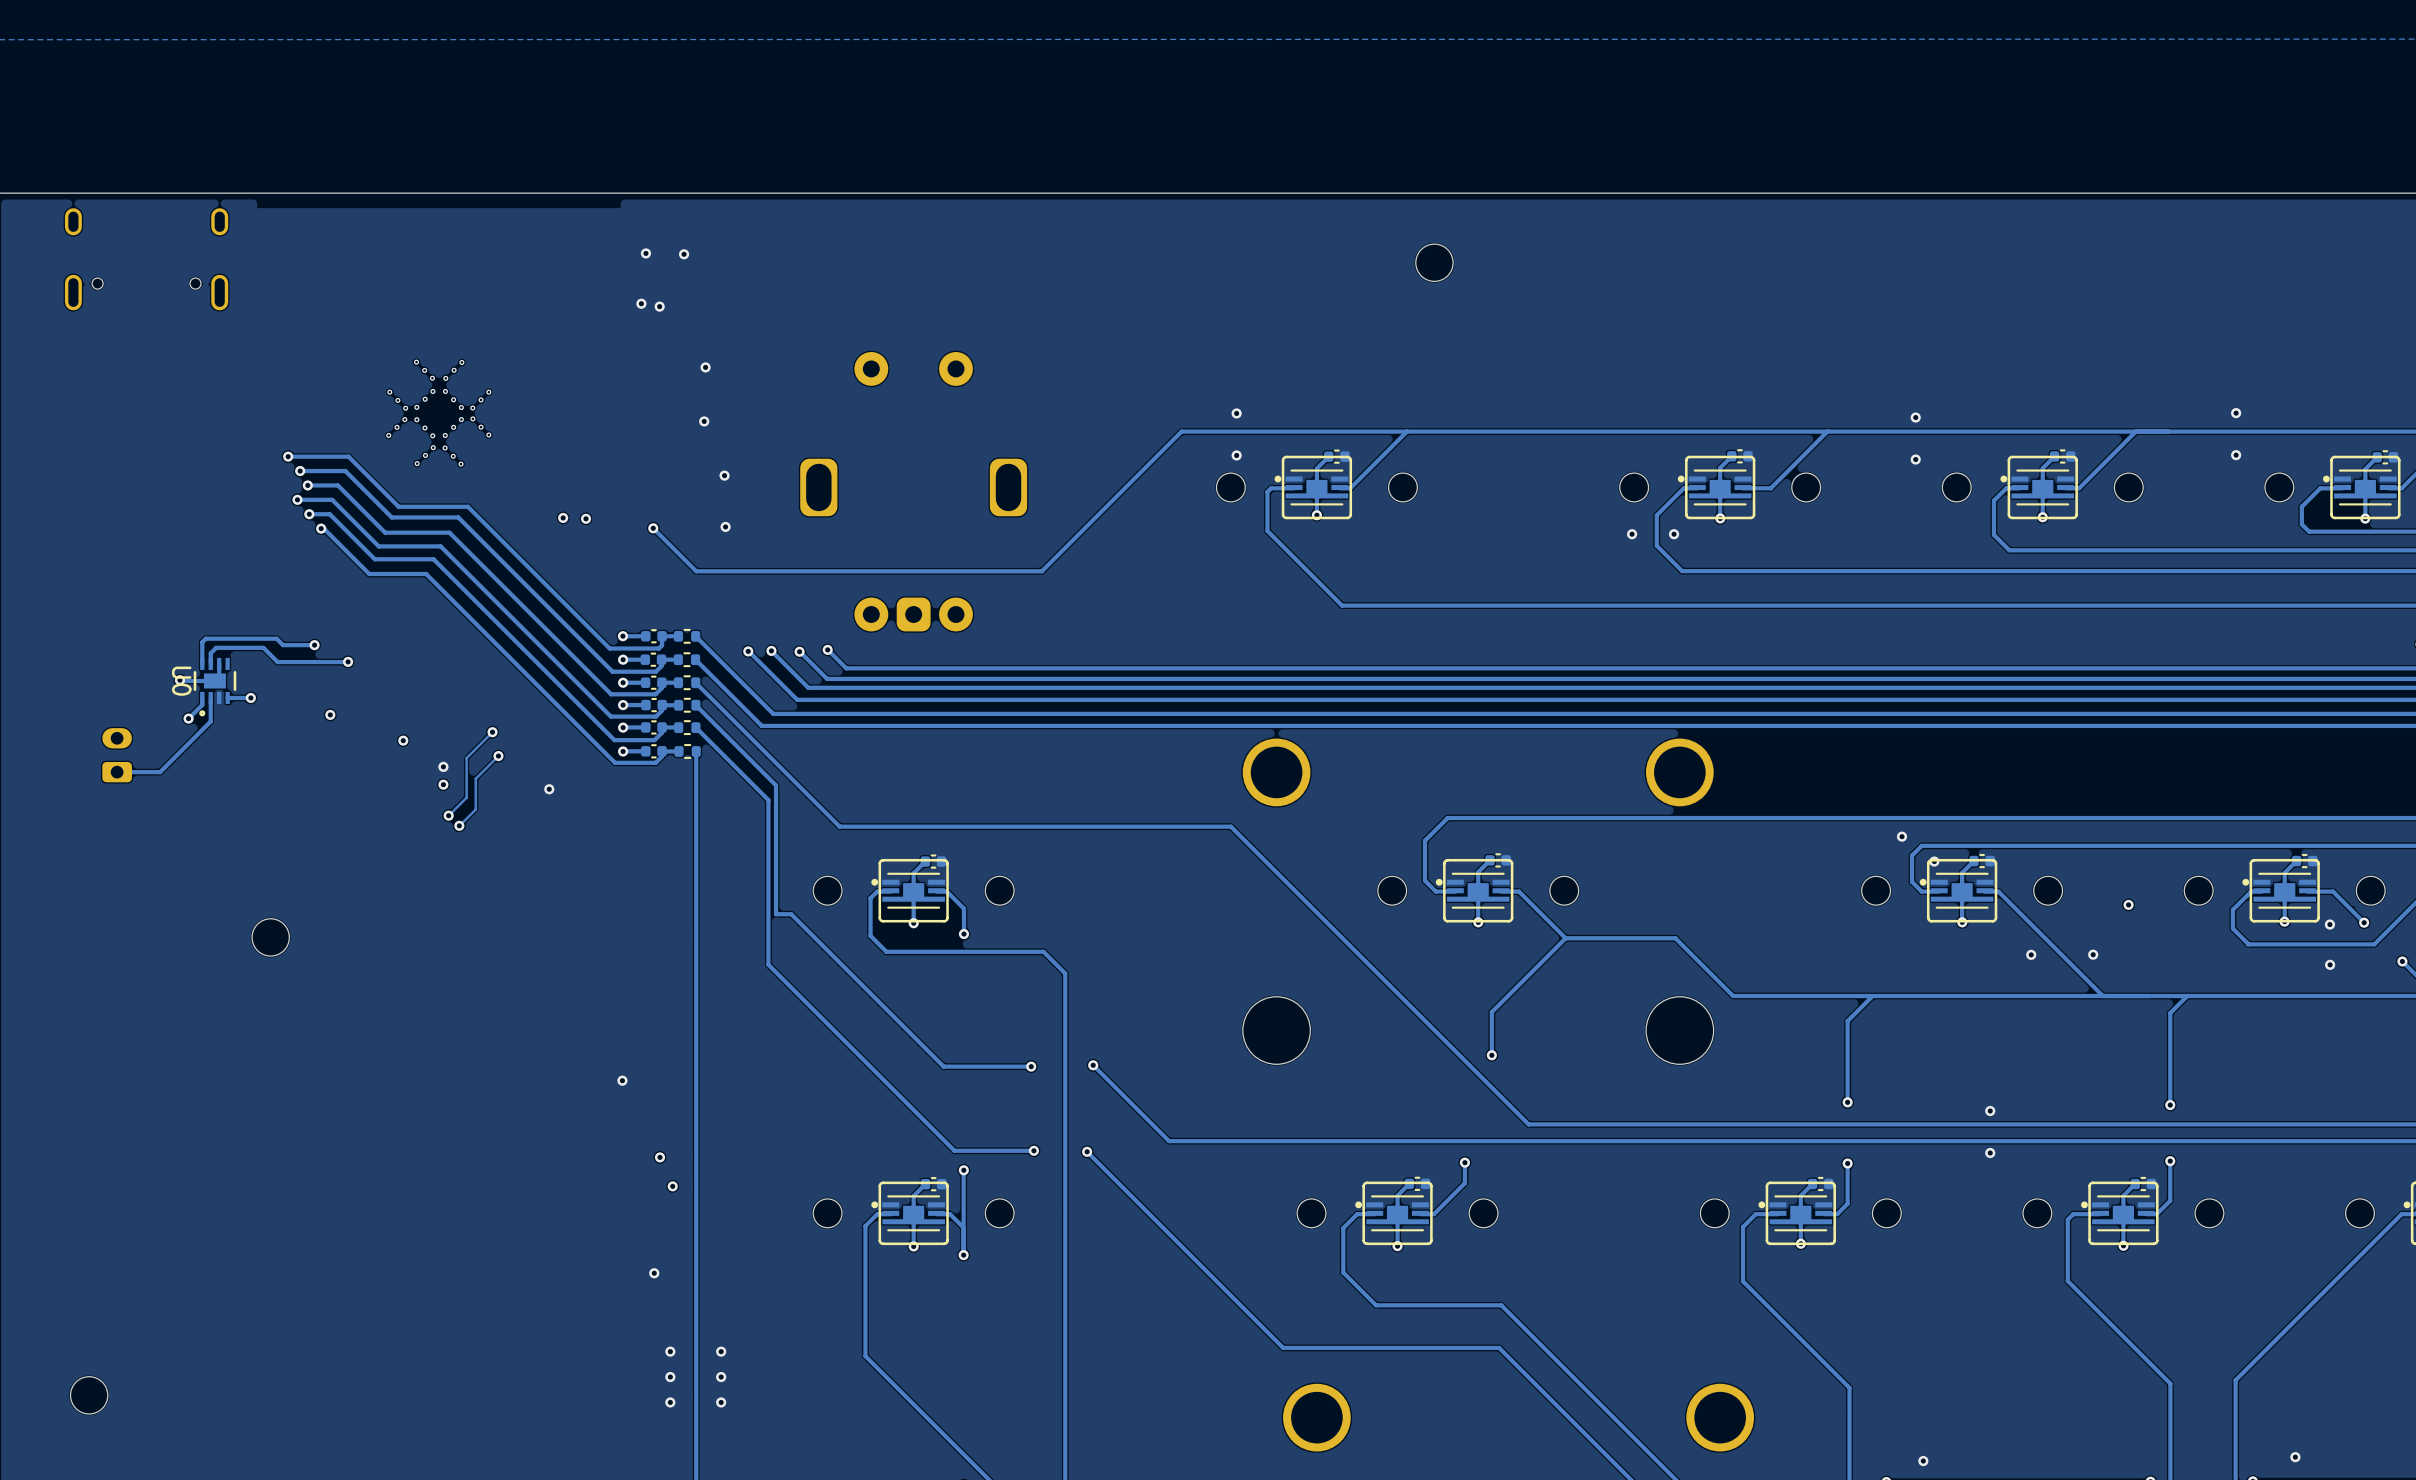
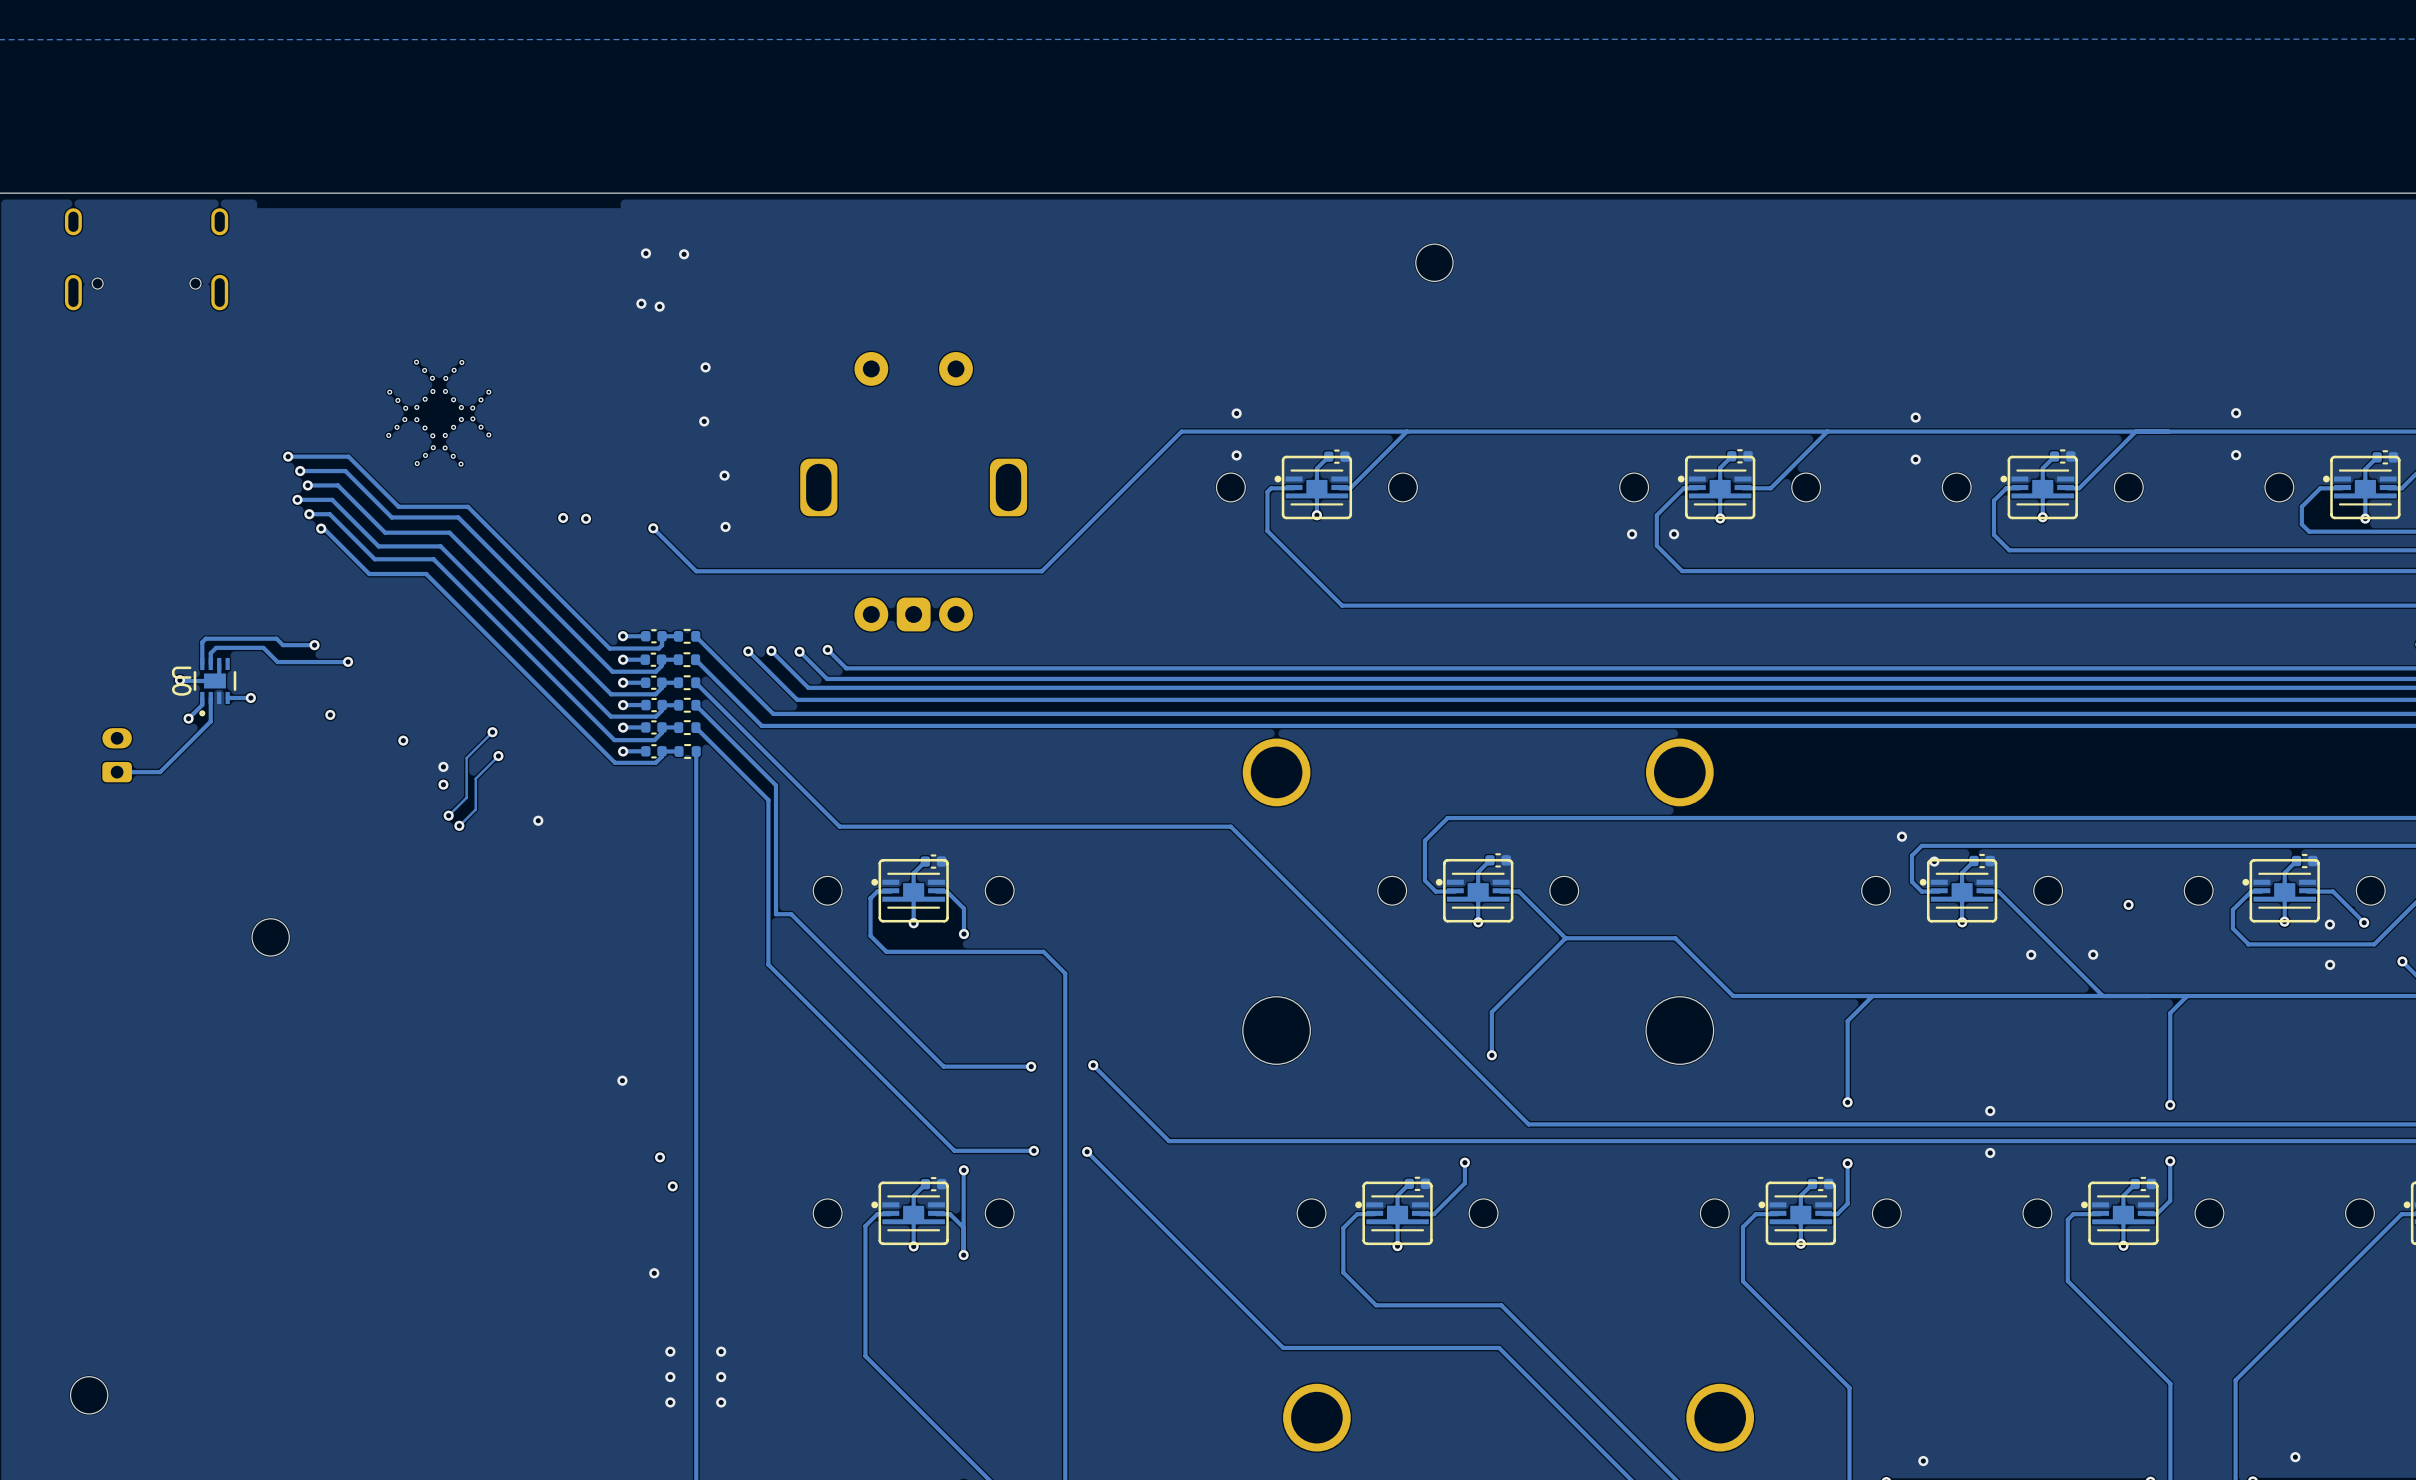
via position: (549, 789) -> (538, 820)

